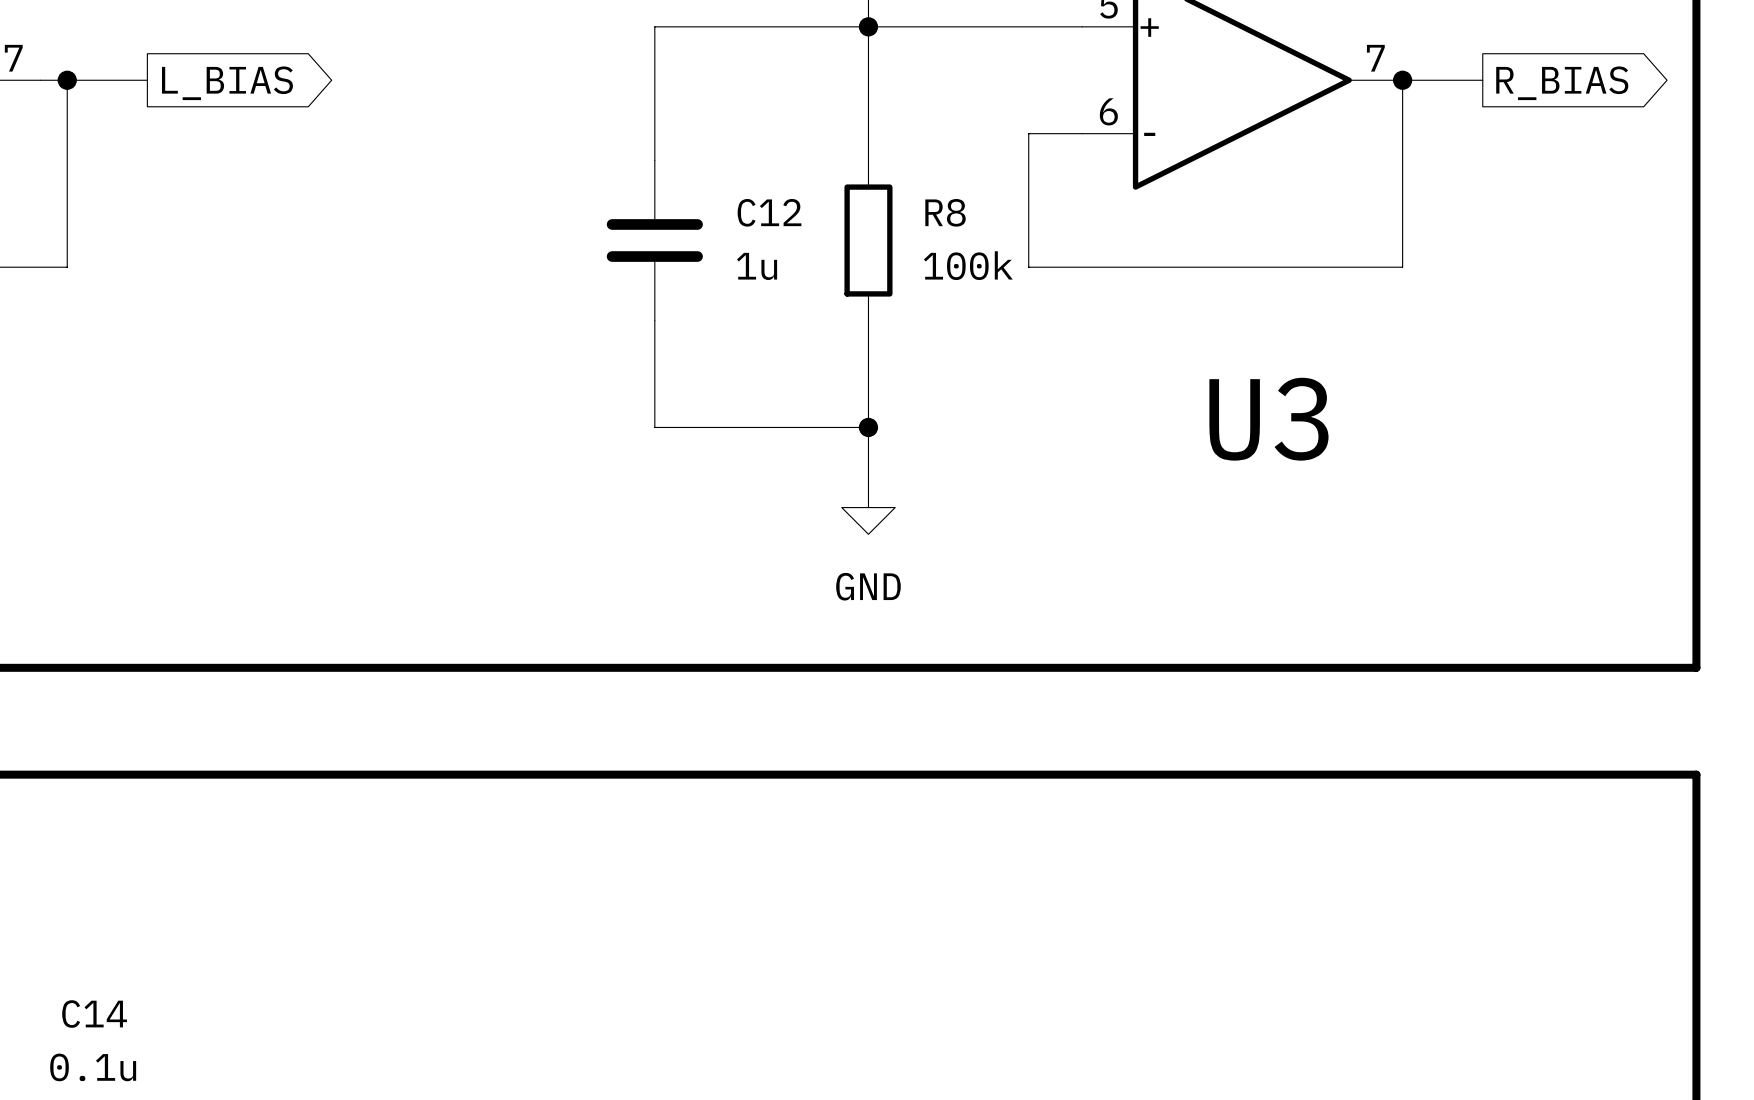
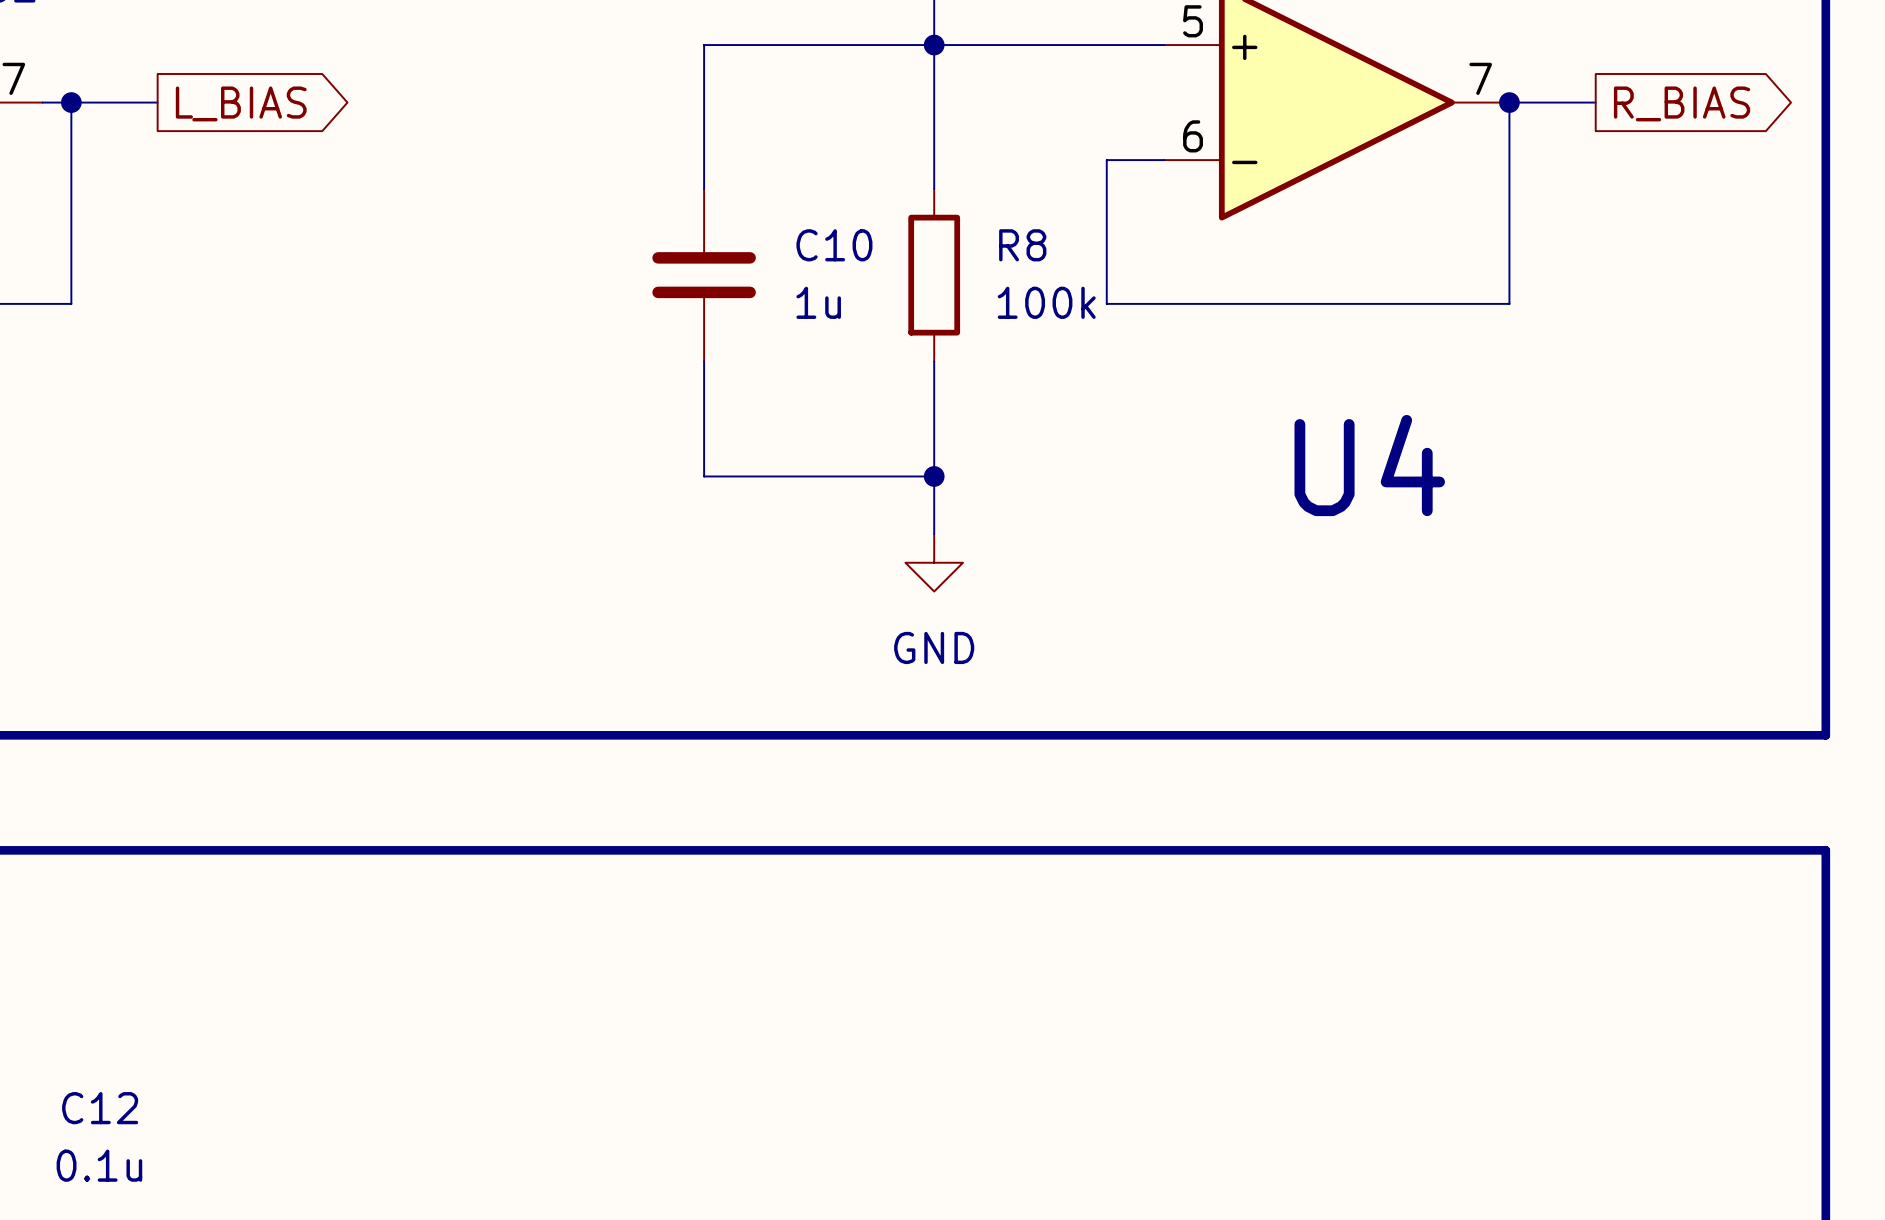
C12 name: C12 (769, 212) -> C10 (834, 245)
text: U3 (1268, 419) -> U4 (1369, 465)
C14 name: C14 (94, 1014) -> C12 (100, 1108)

